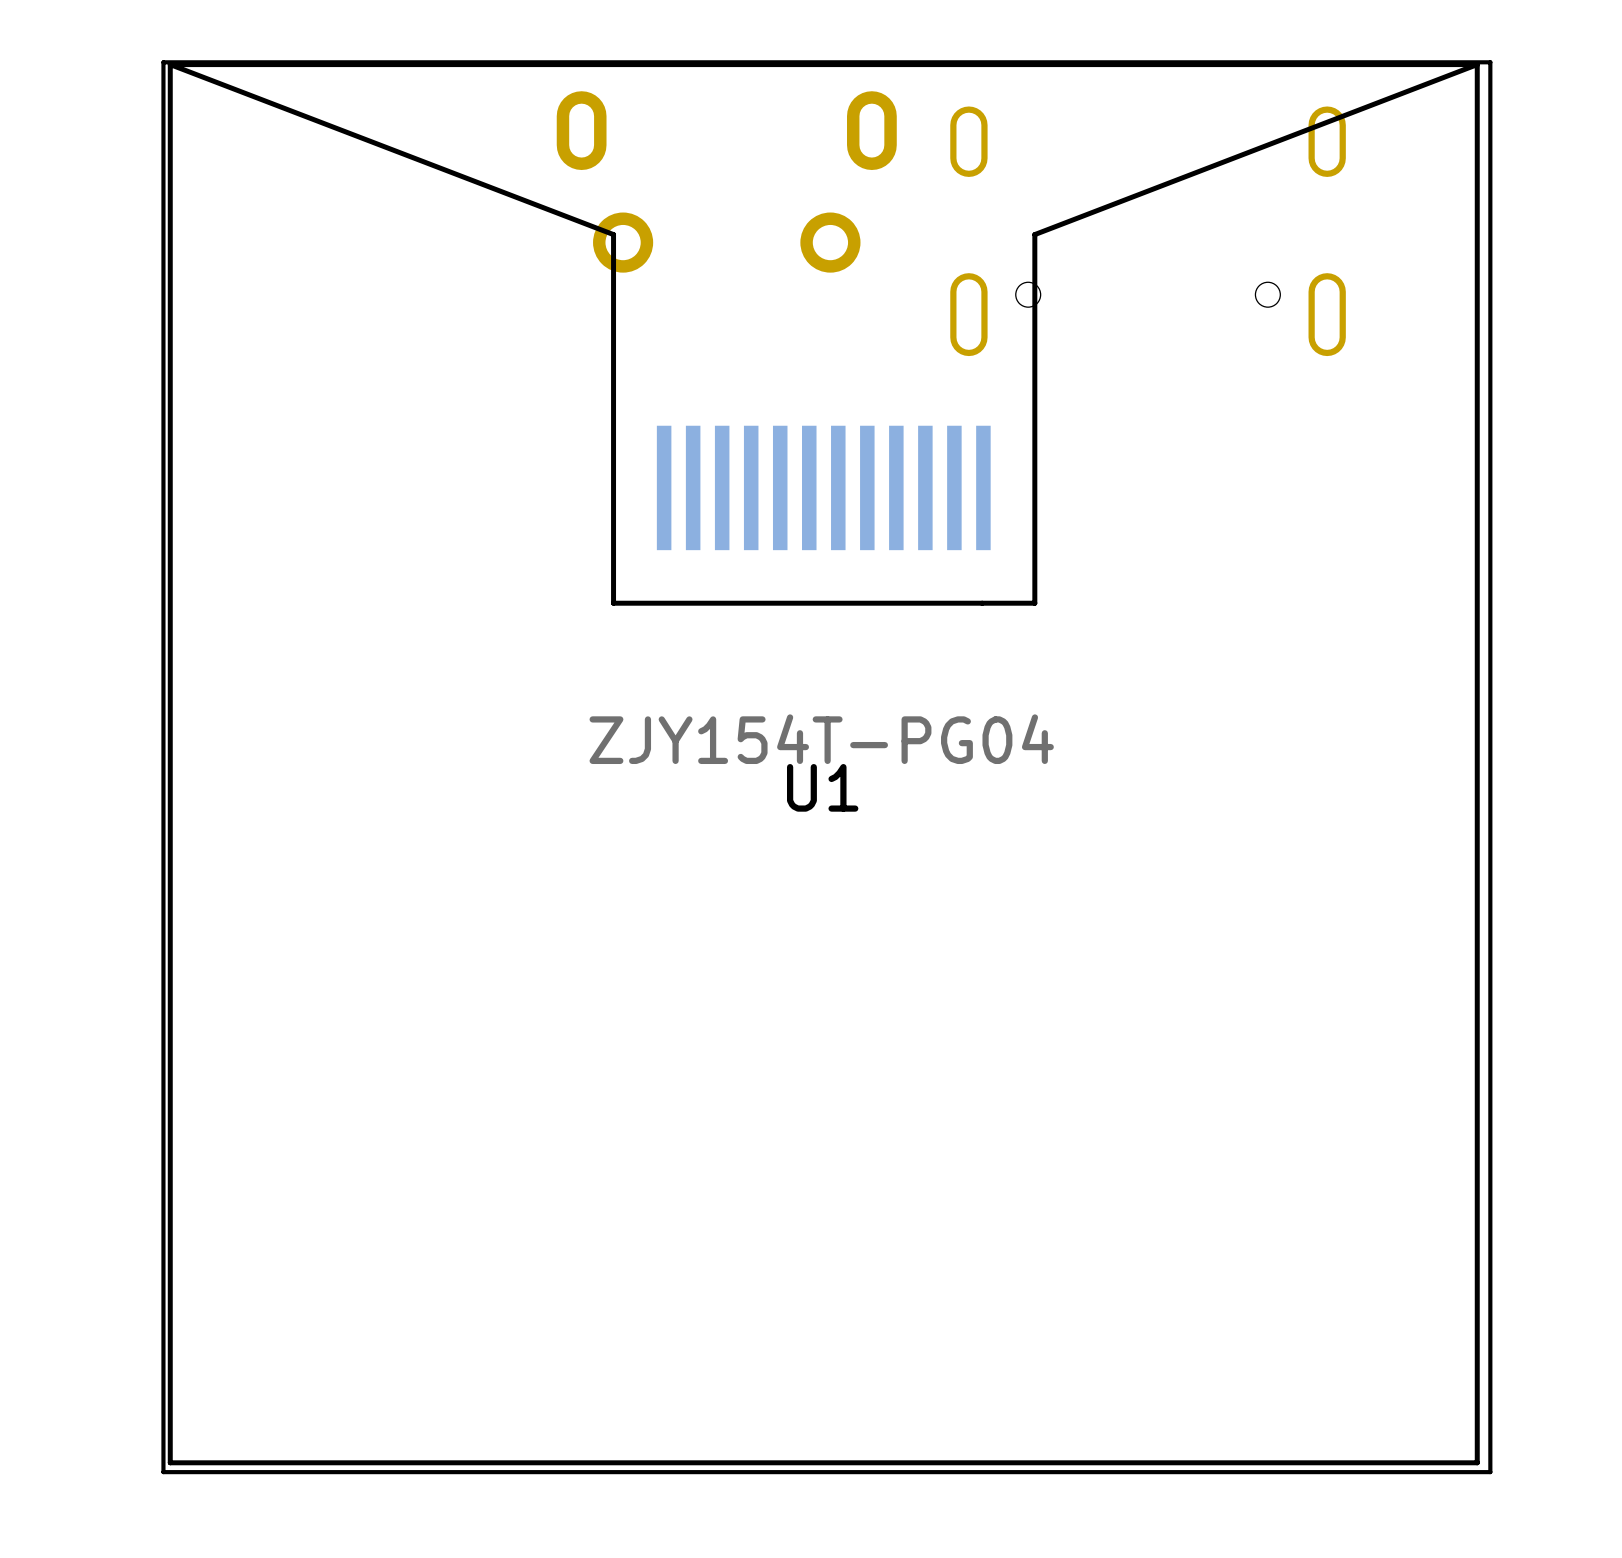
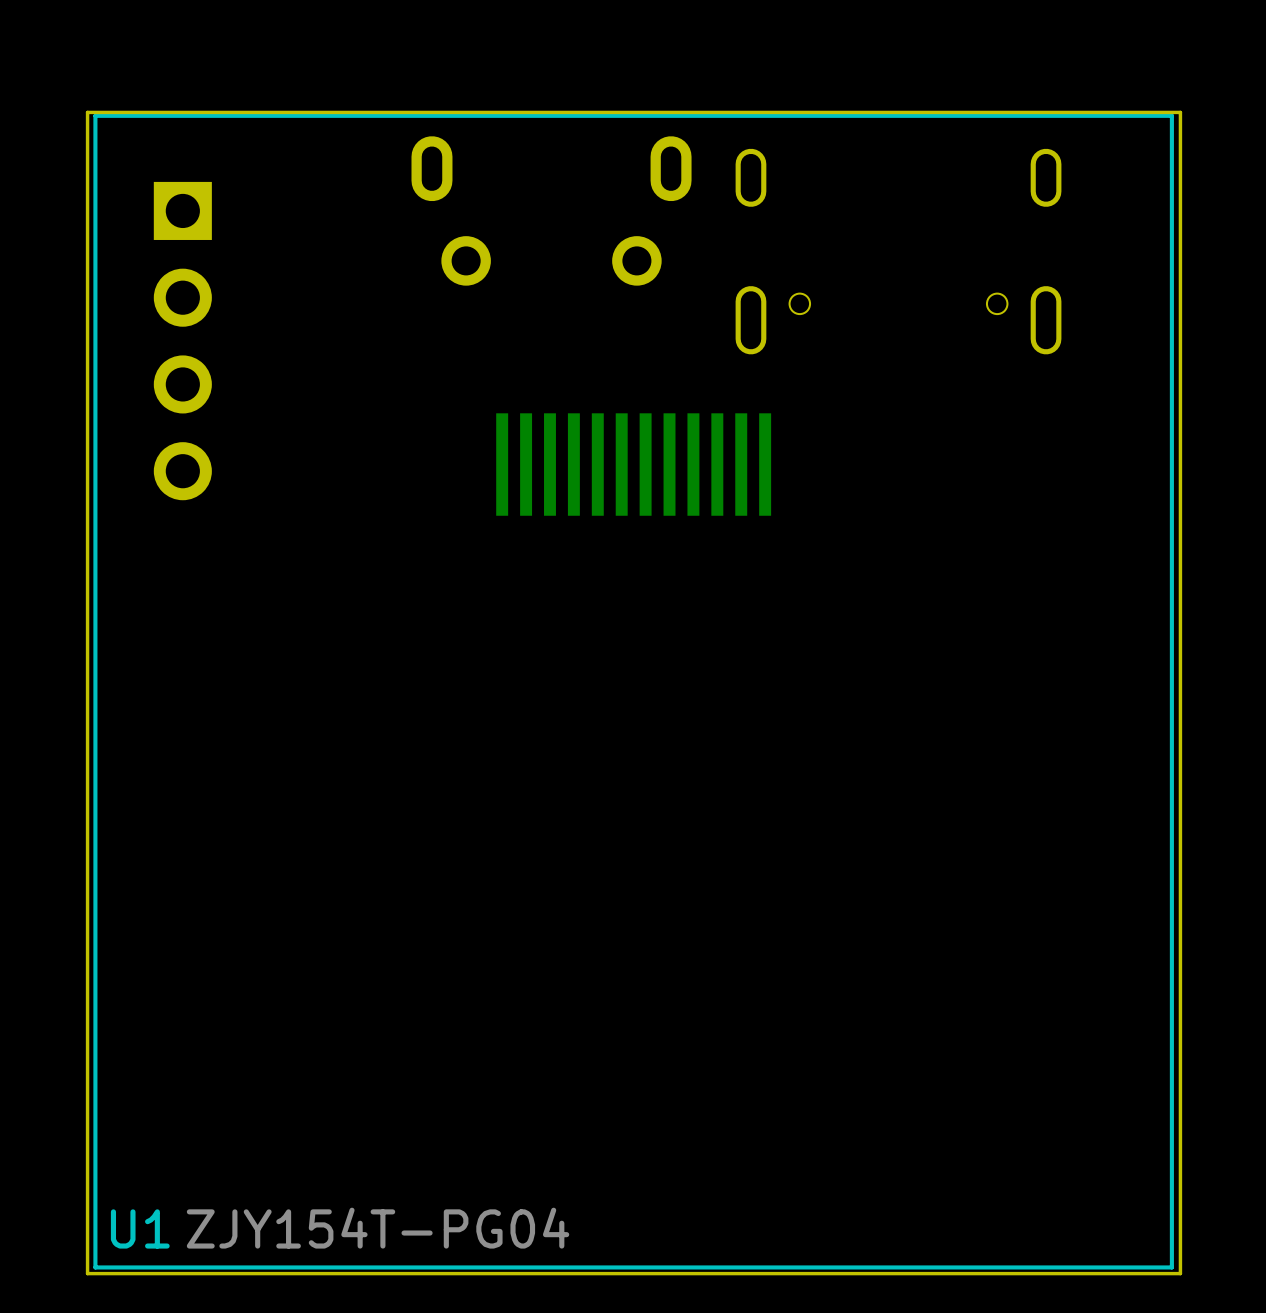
U1 footprint: [167, 62, 1480, 1466] -> [93, 113, 1174, 1270]
part: none -> (182, 341)
U1 value position: ZJY154T-PG04 (821, 739) -> ZJY154T-PG04 (378, 1228)
U1 name position: U1 (822, 787) -> U1 (140, 1228)

